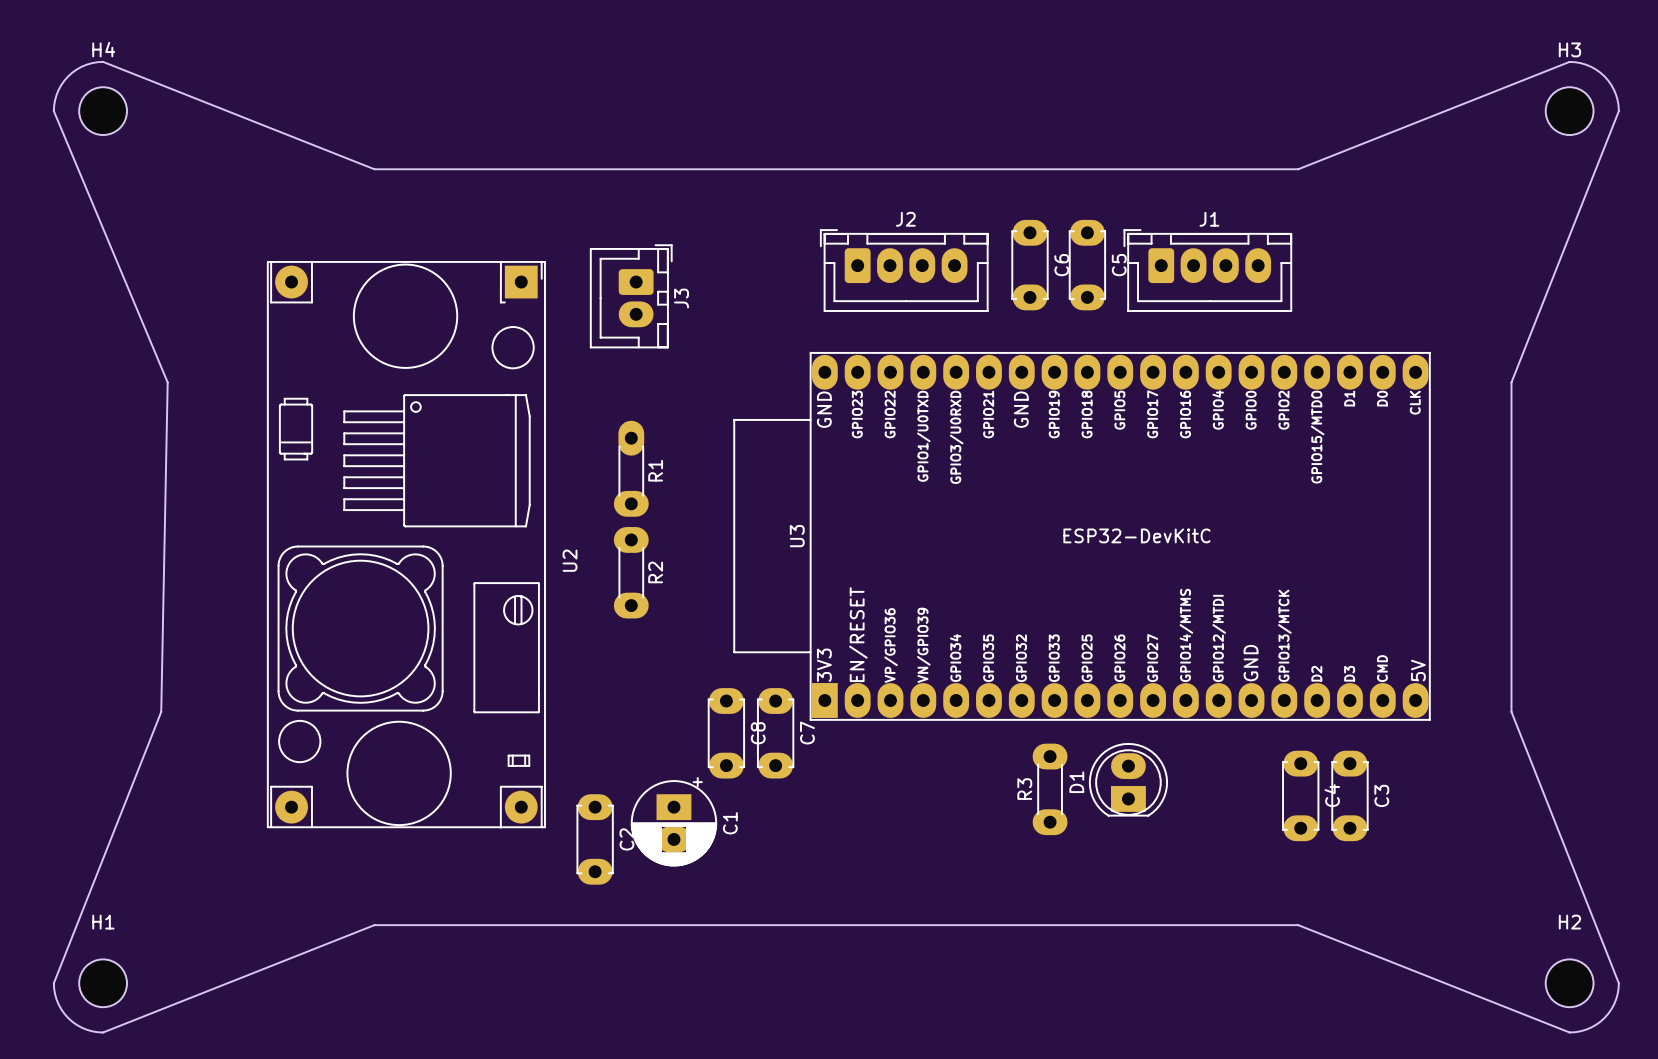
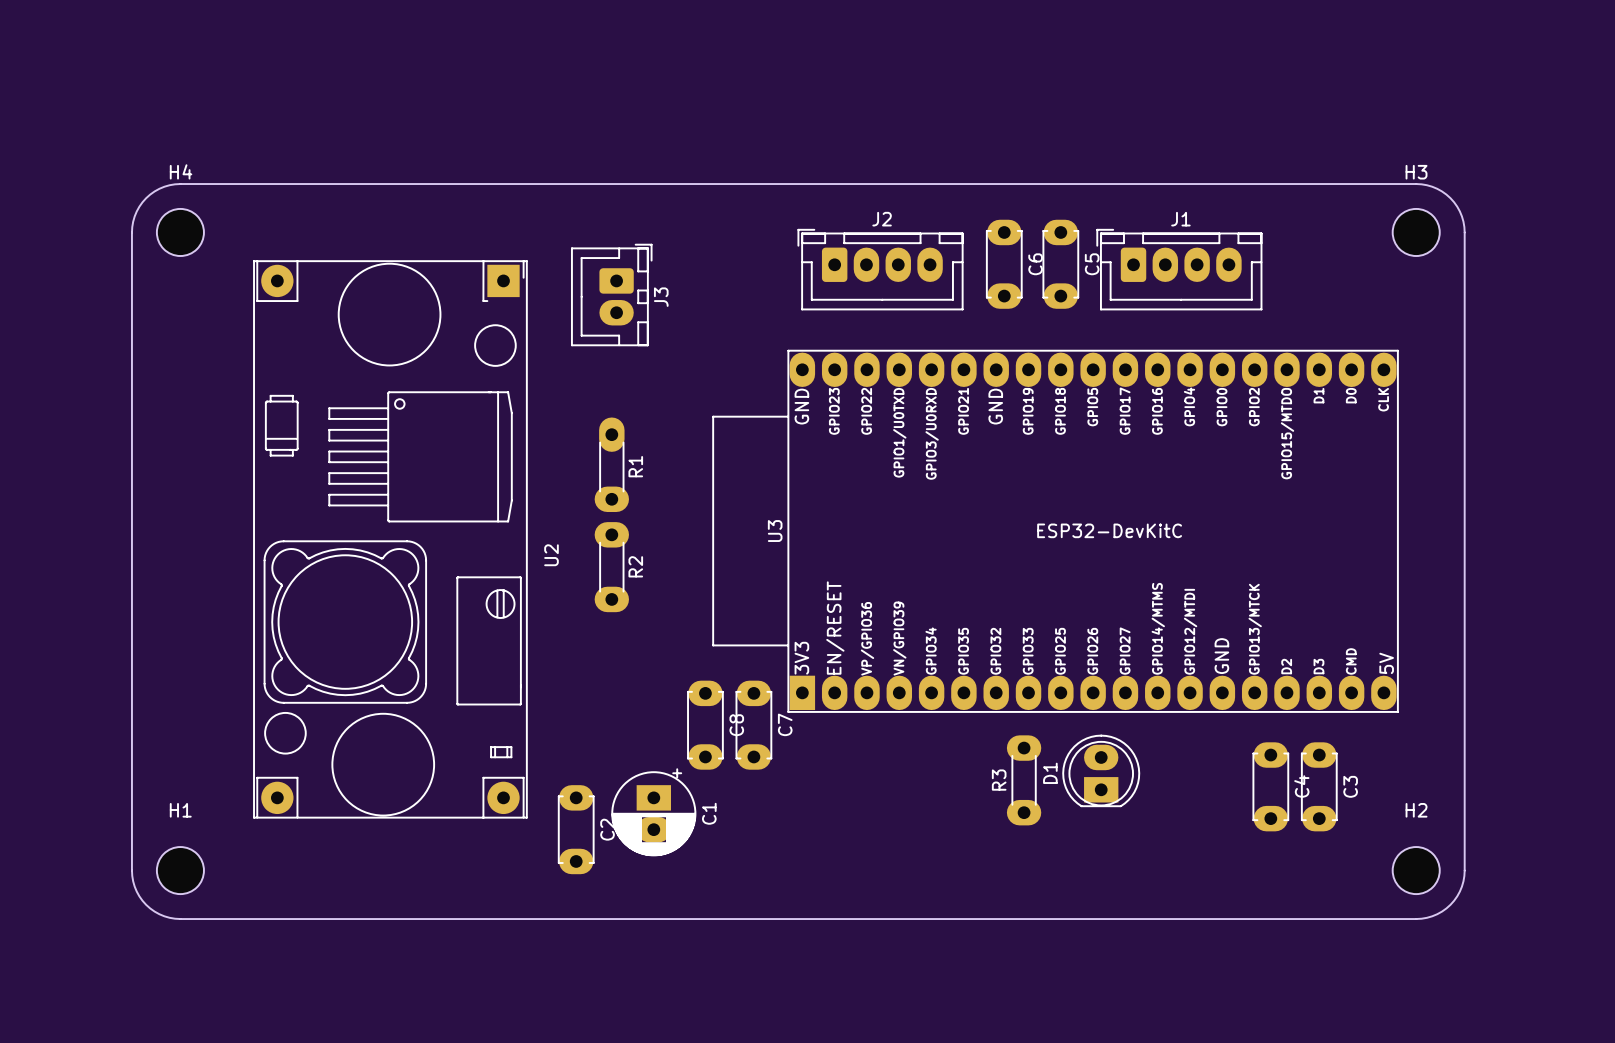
board edge: (103, 61) (374, 169) (1298, 169) (1569, 61) (1580, 63) (1595, 69) (1604, 76) (1613, 89) (1618, 111) (1511, 382) (1511, 711) (1618, 983) (1617, 994) (1611, 1009) (1604, 1018) (1590, 1027) (1569, 1032) (1298, 925) (374, 925) (103, 1032) (92, 1031) (76, 1024) (68, 1018) (58, 1004) (53, 983) (161, 711) (167, 382) (53, 111) (56, 94) (68, 76) (86, 64) (103, 61) -> (180, 184) (164, 186) (146, 198) (134, 216) (131, 232) (131, 870) (134, 886) (139, 896) (154, 911) (169, 917) (180, 919) (1416, 919) (1432, 916) (1442, 911) (1457, 896) (1463, 881) (1464, 870) (1464, 232) (1459, 211) (1450, 198) (1442, 191) (1427, 185) (1416, 184) (180, 184)
H4 position: (103, 111) -> (180, 232)
H3 position: (1569, 111) -> (1416, 232)
H1 position: (103, 983) -> (180, 870)
H2 position: (1569, 983) -> (1416, 870)

